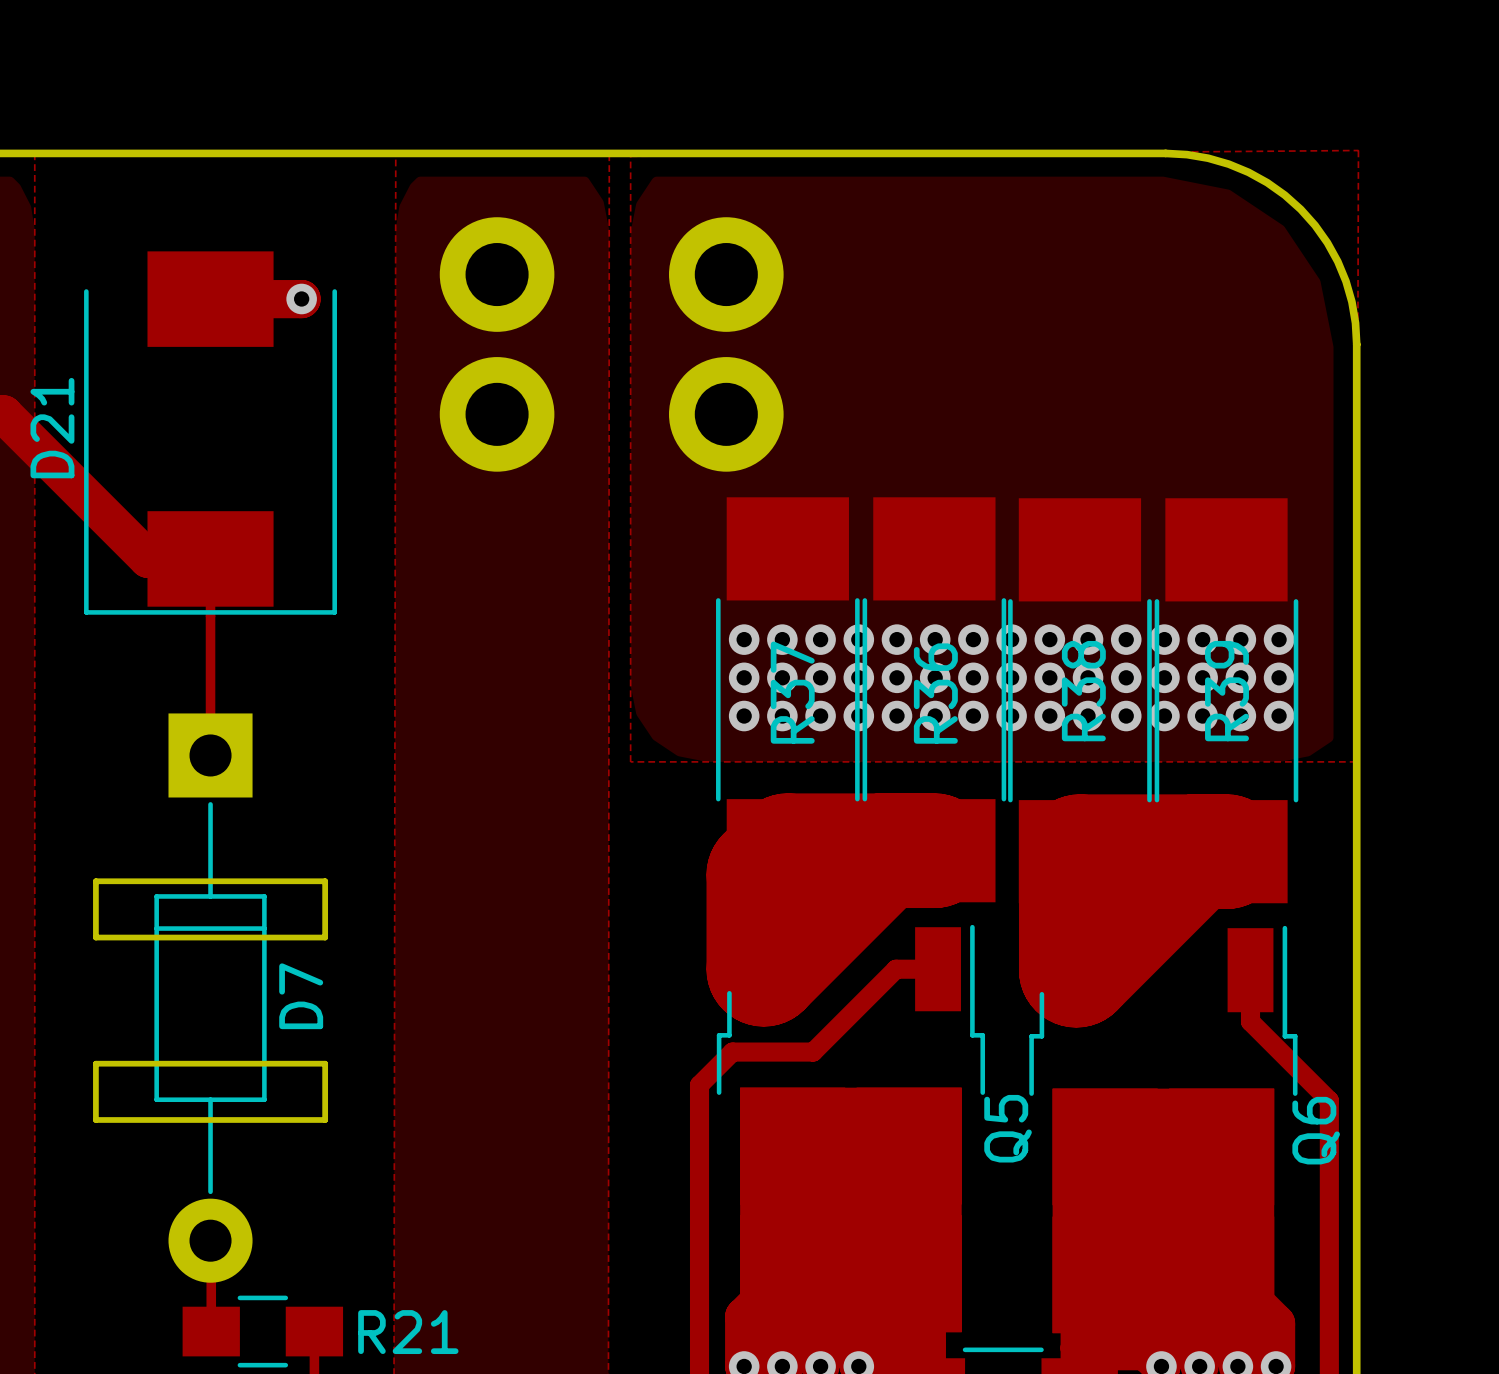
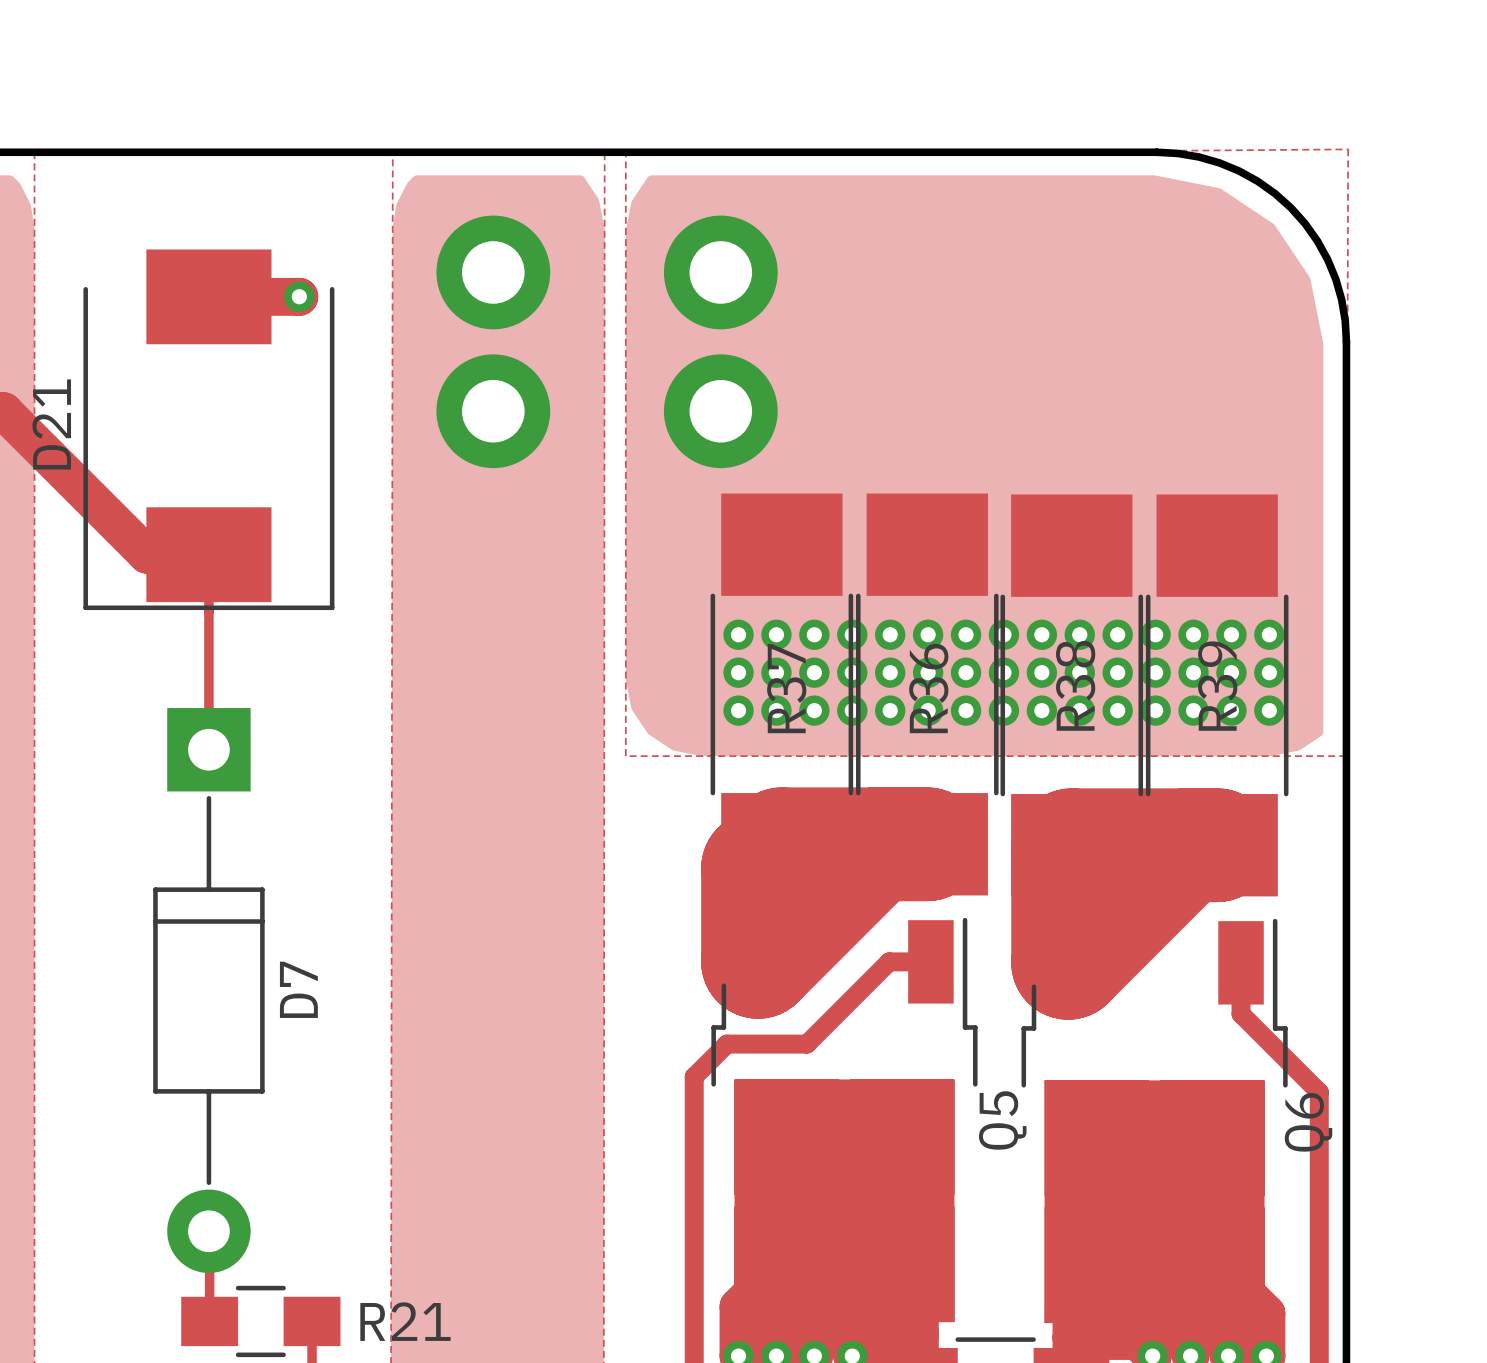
board edge: (95, 881) (325, 881) (325, 937) (95, 937) (95, 881) -> none
board edge: (95, 1063) (95, 1119) (325, 1119) (325, 1063) (95, 1063) -> none

